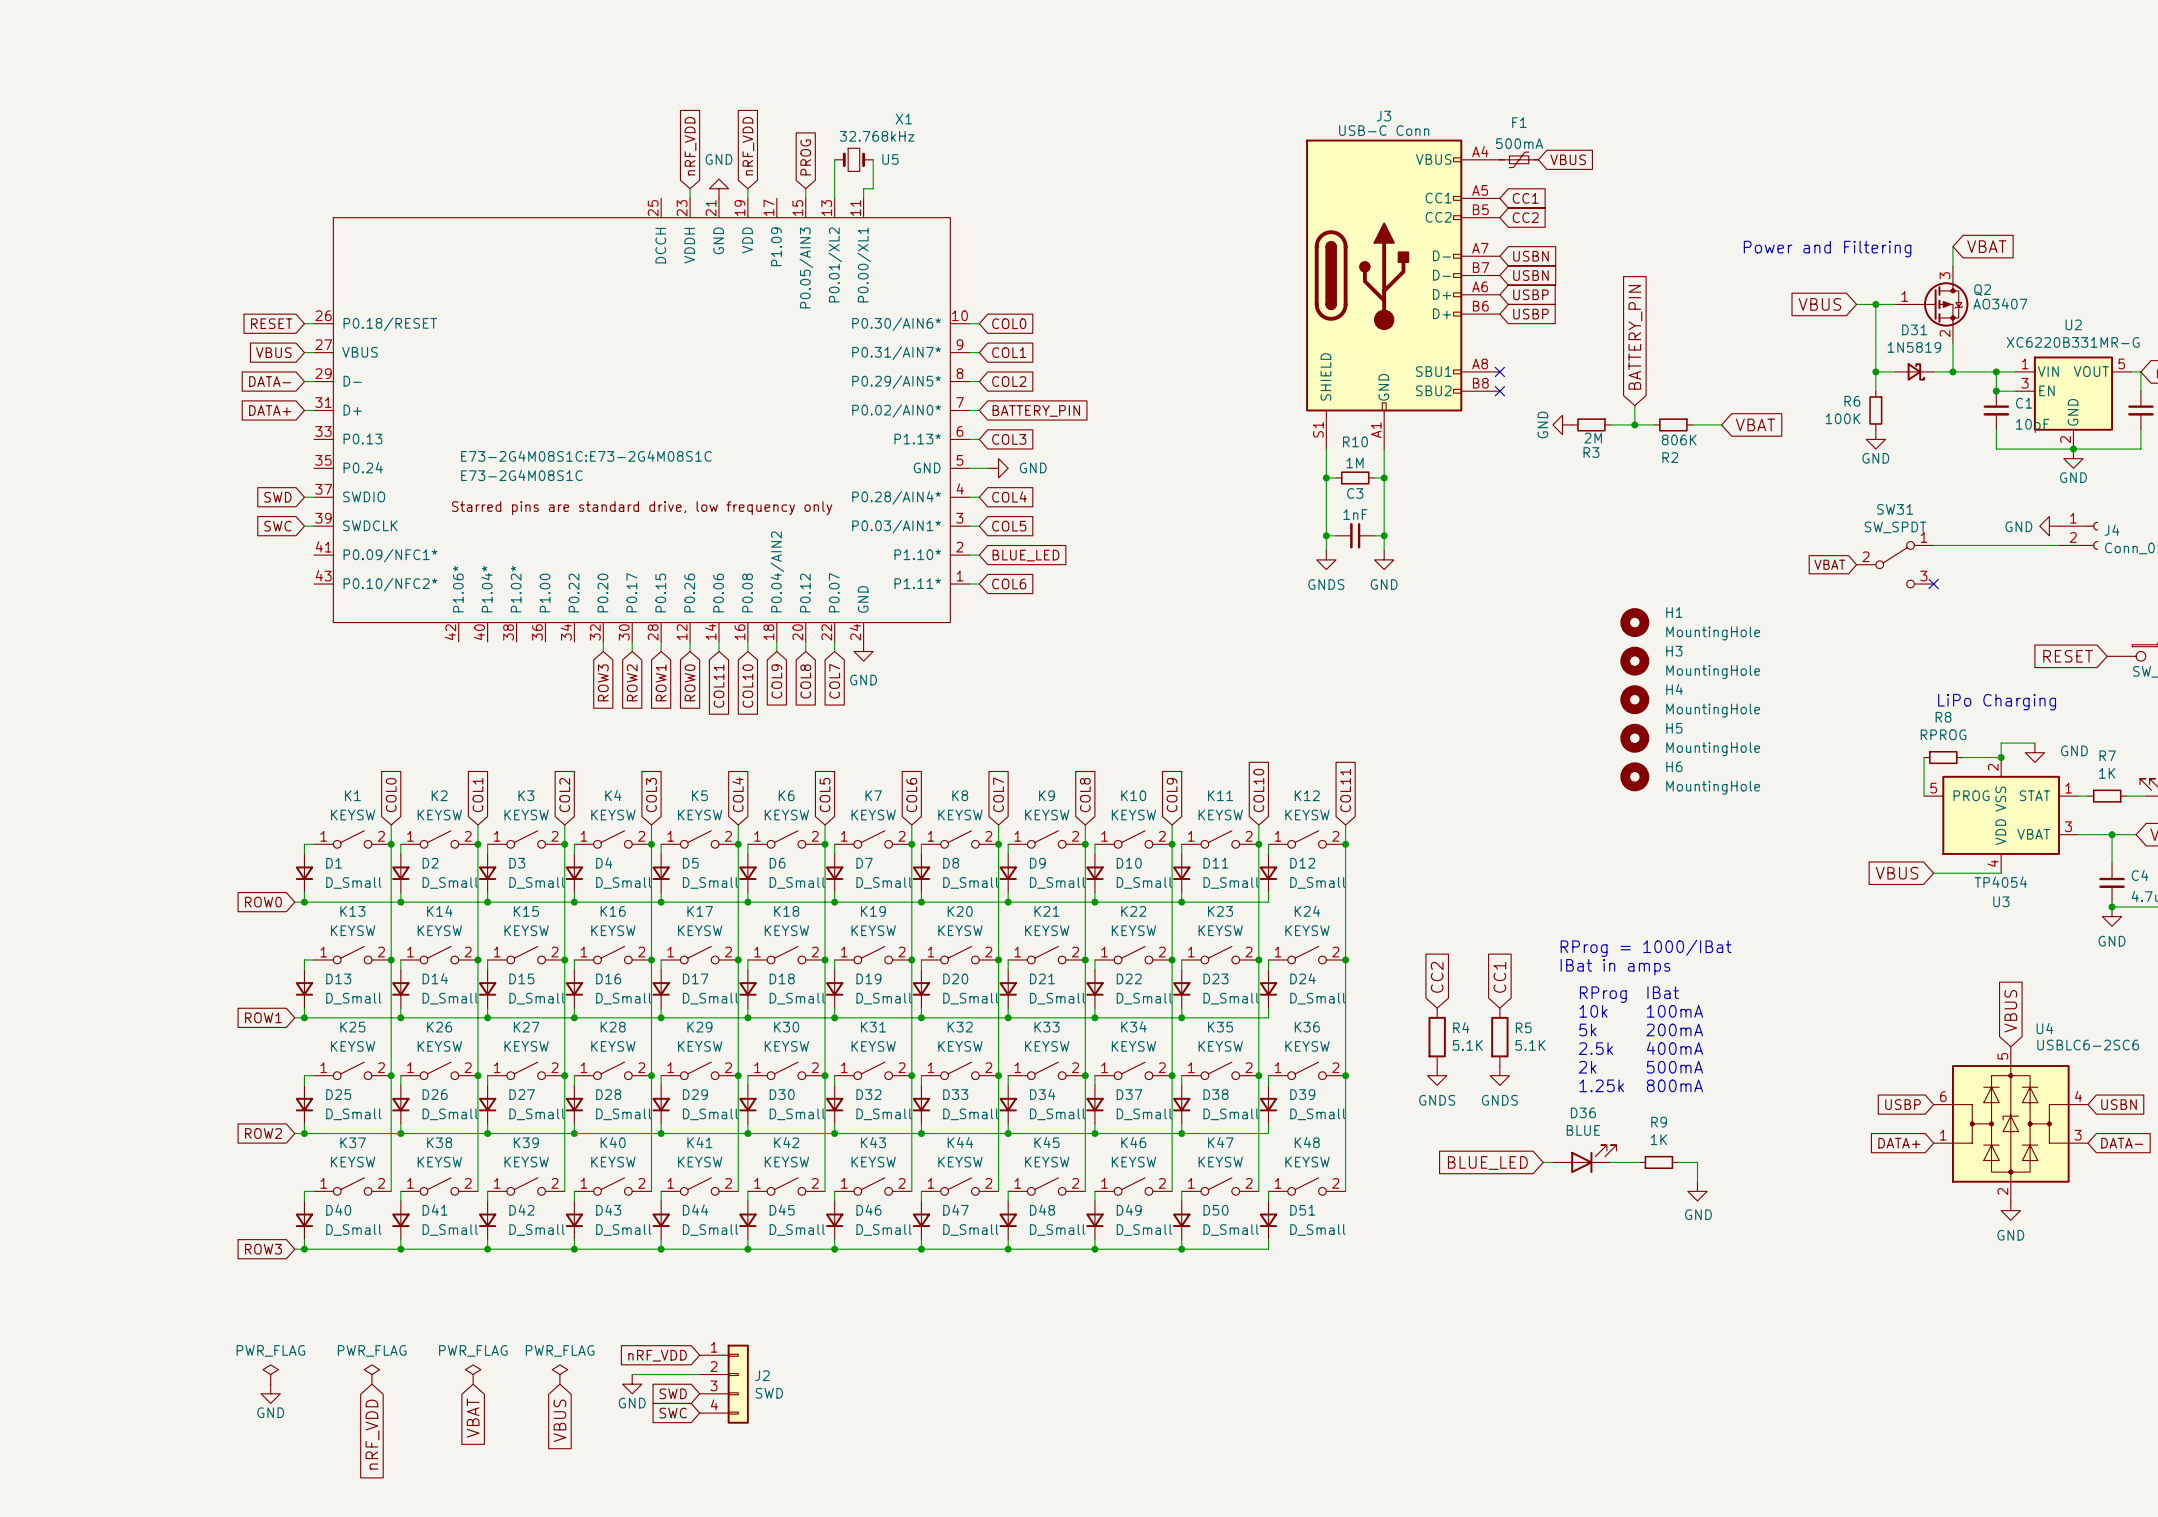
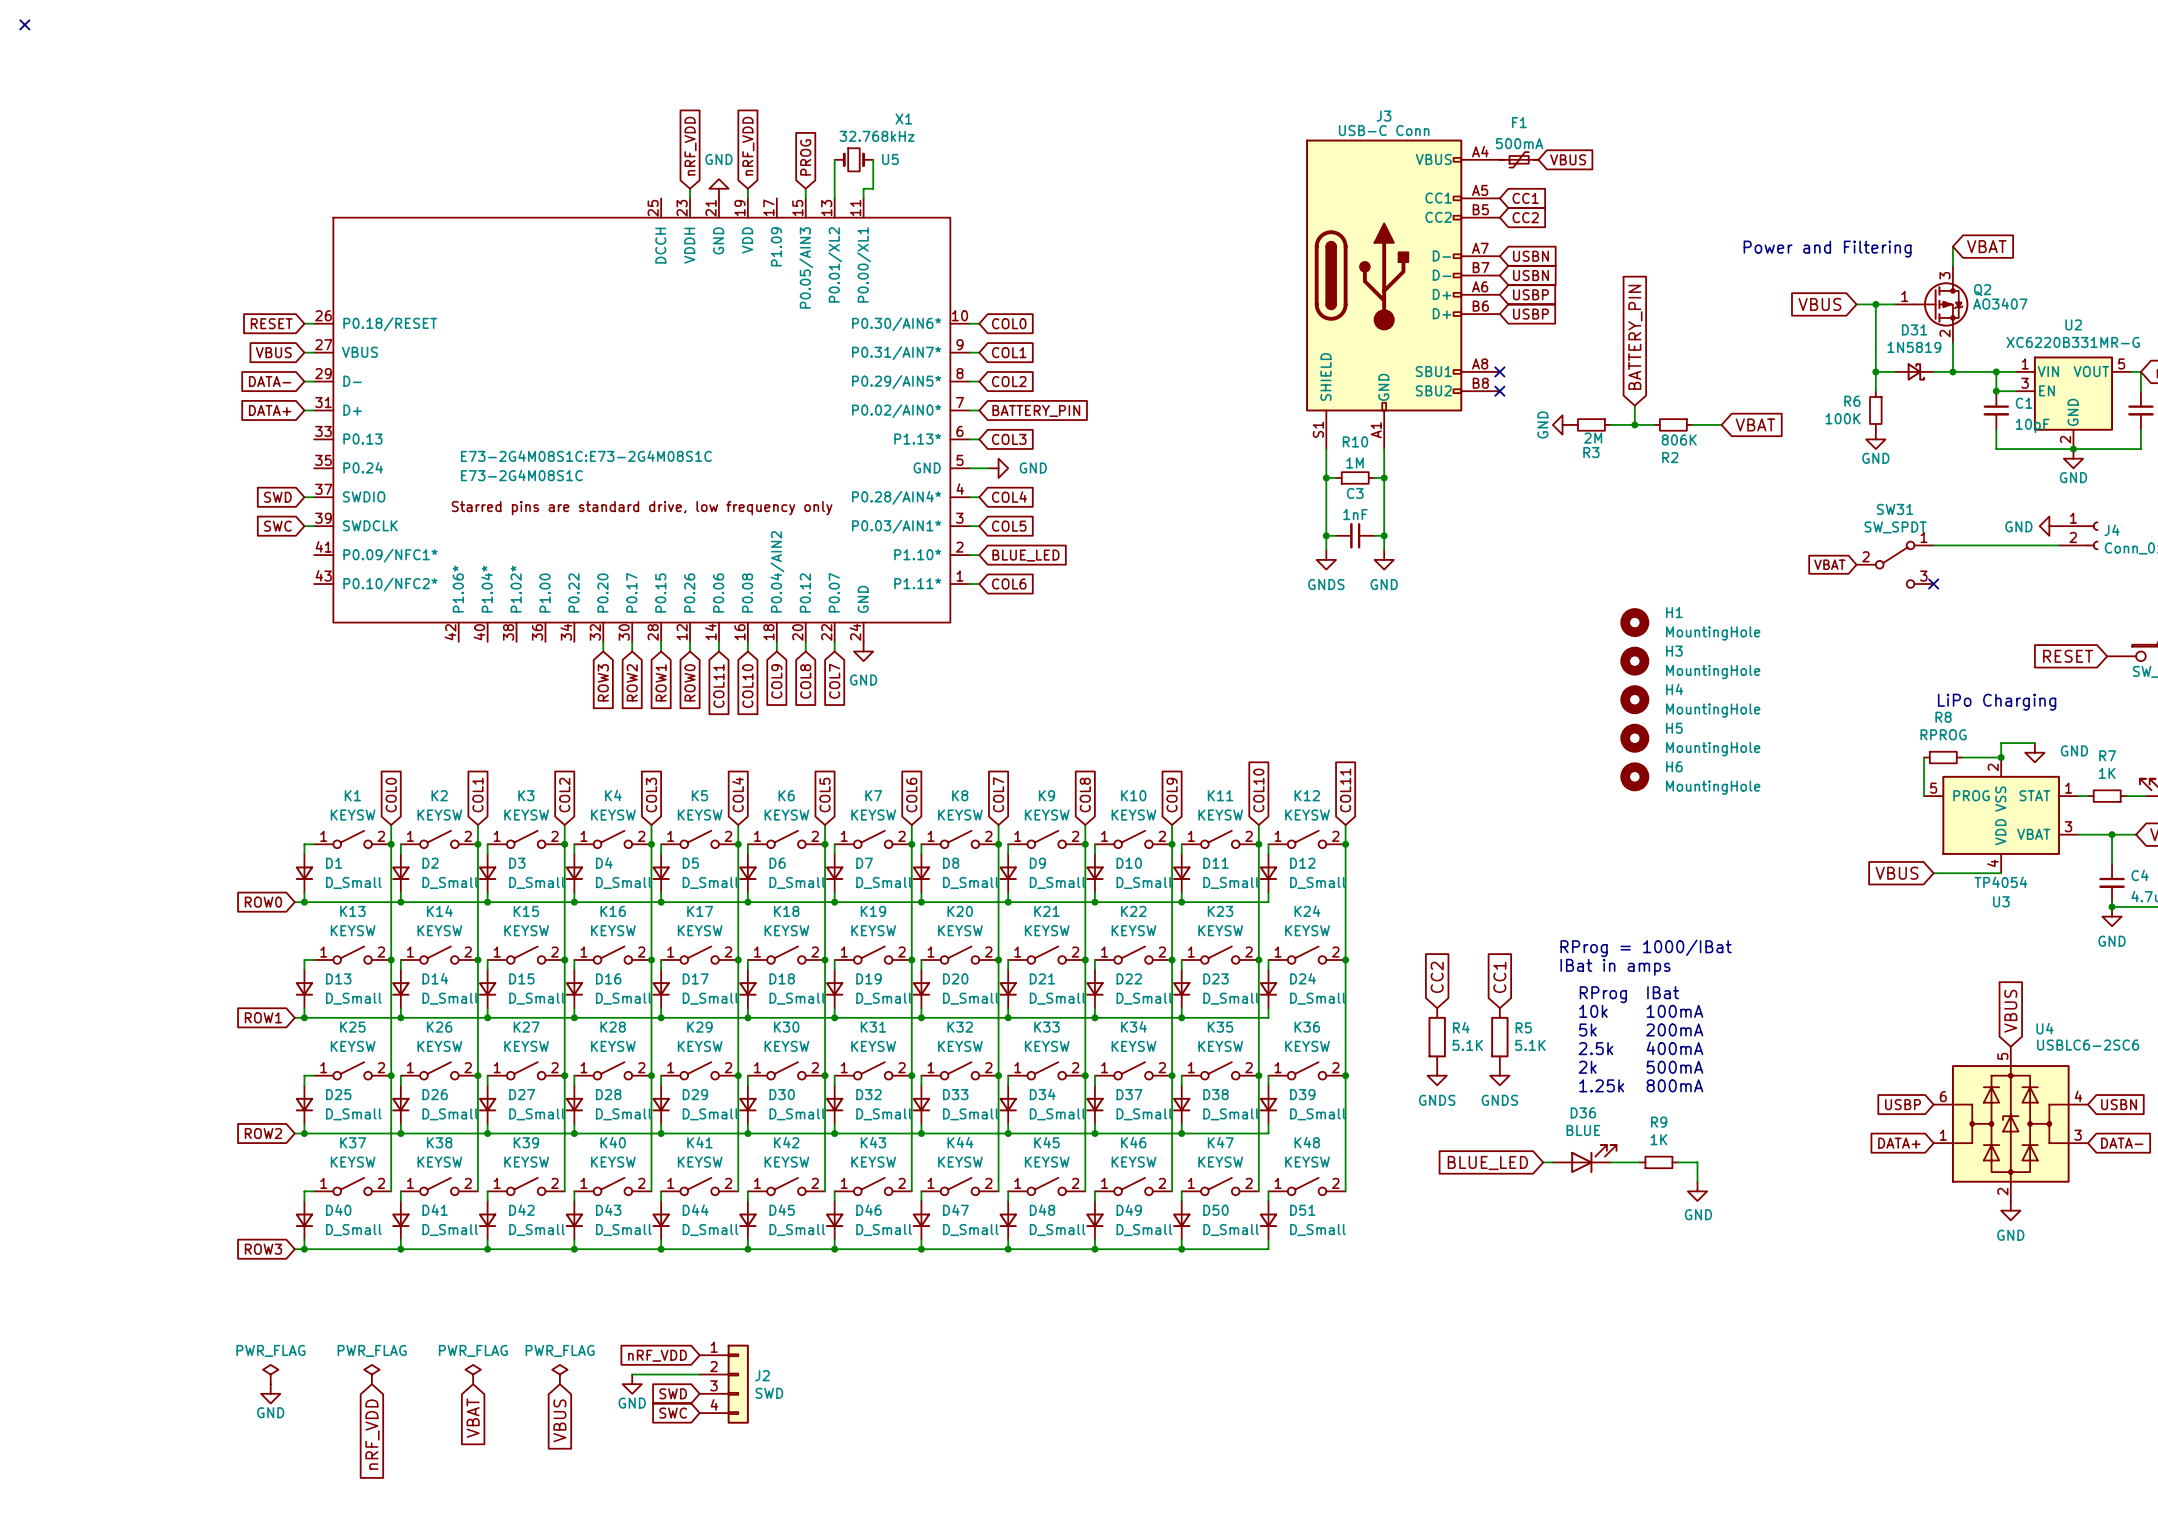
no-connect mark: none -> (24, 24)

